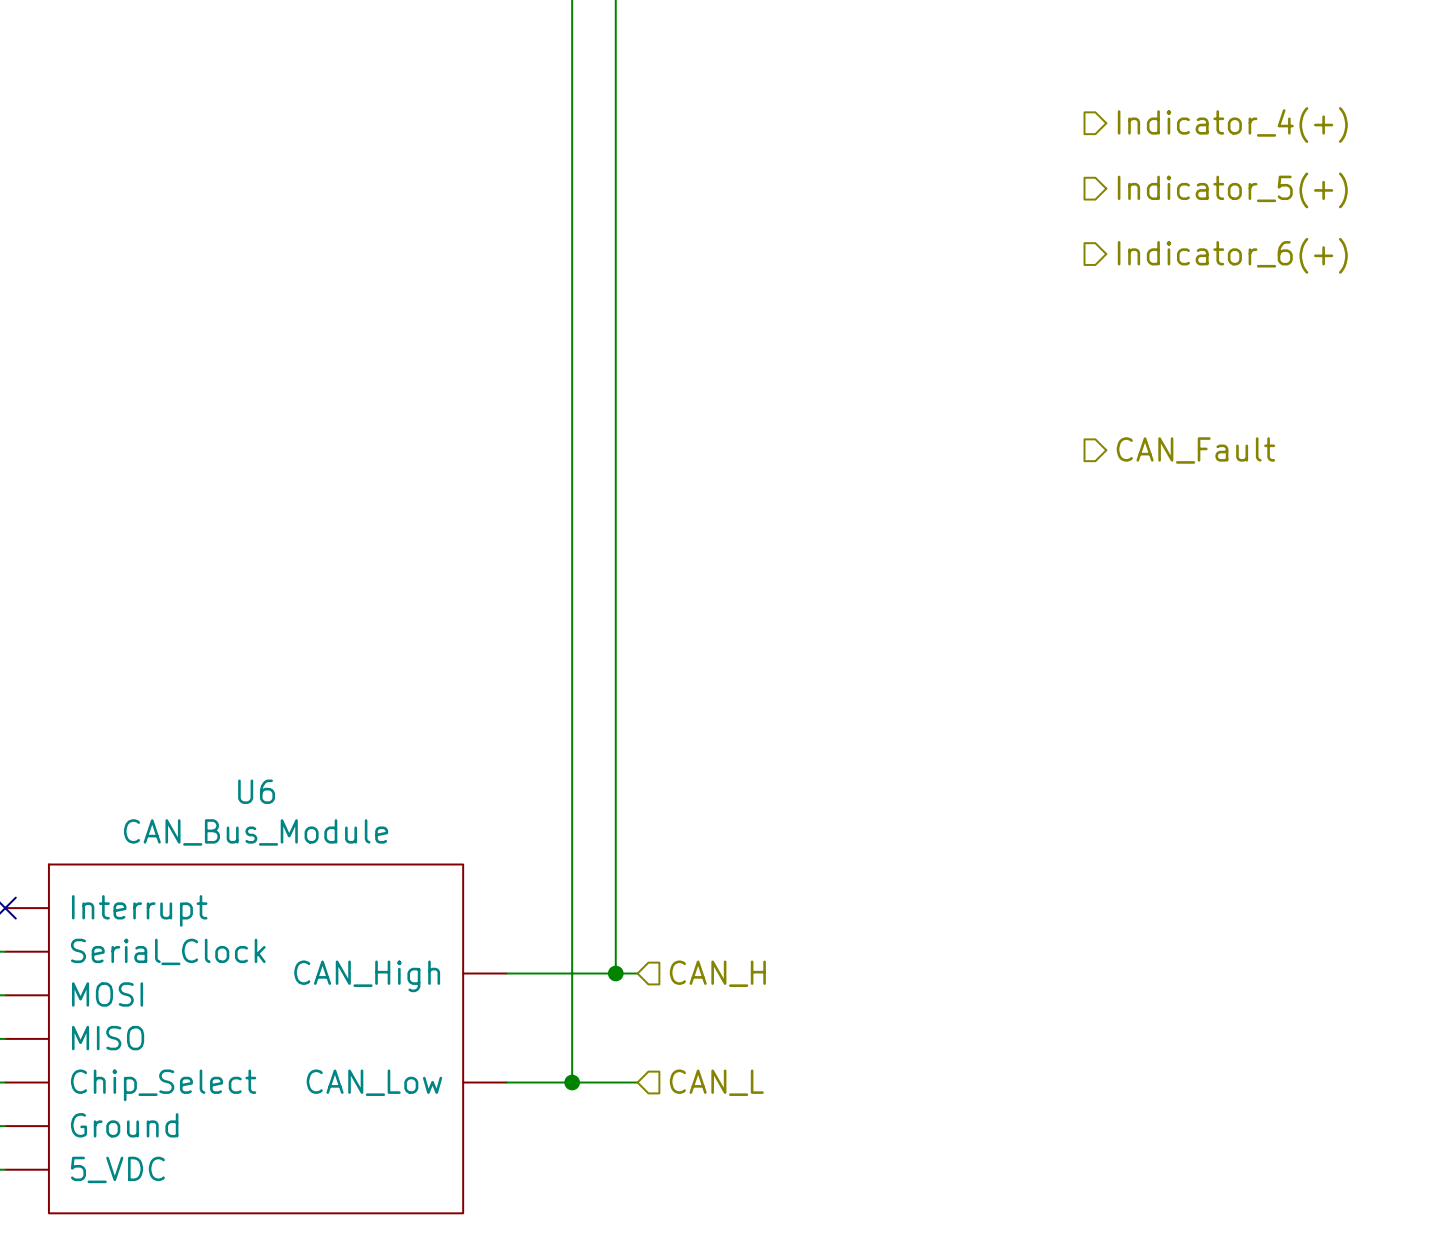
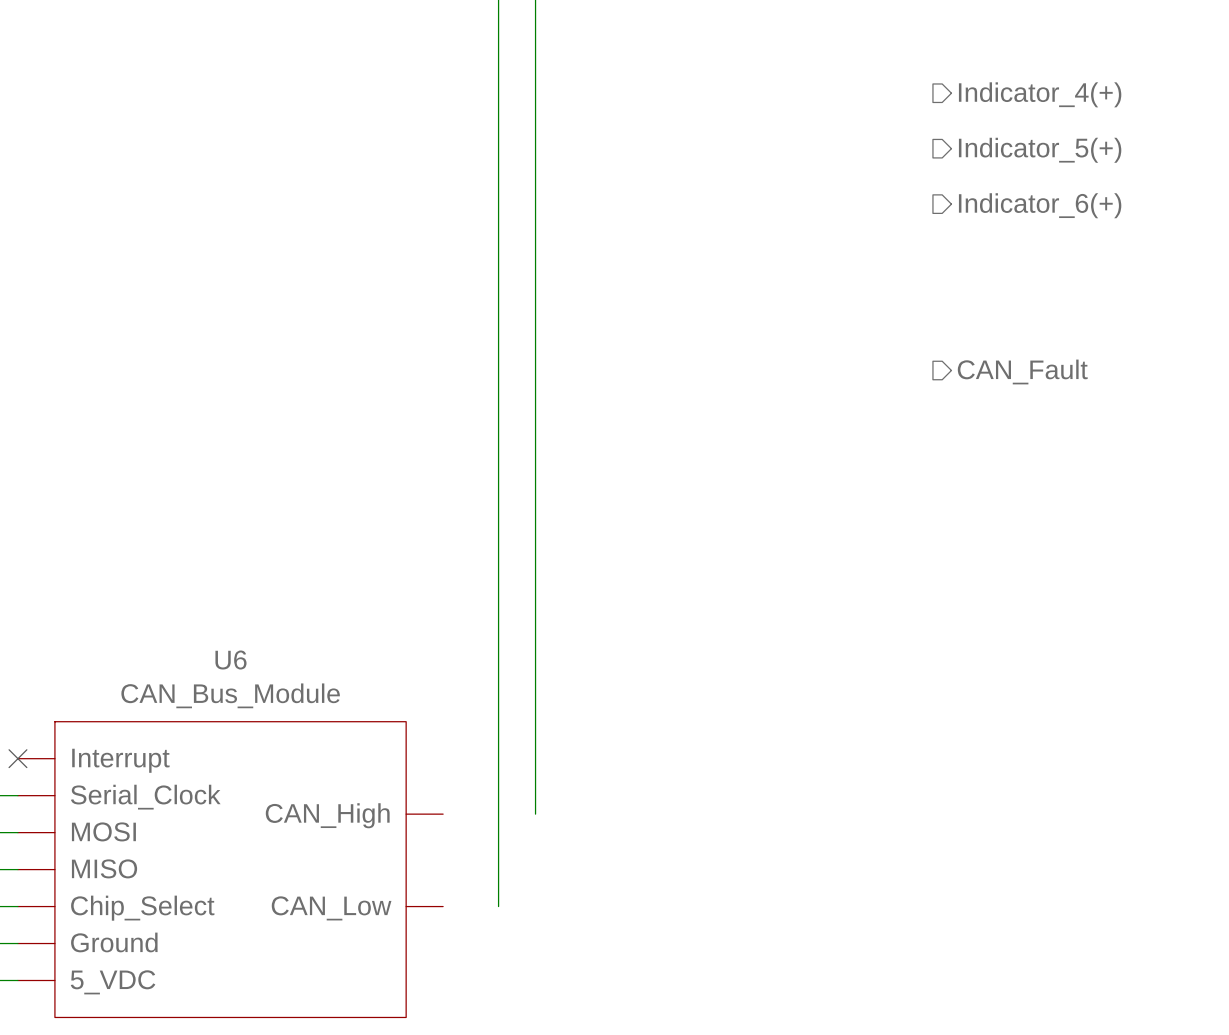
wire: (506, 973) (637, 973) -> none
junction: (615, 973) -> none
hierarchical label: CAN_H (717, 973) -> none
wire: (506, 1082) (637, 1082) -> none
junction: (572, 1082) -> none
hierarchical label: CAN_L (716, 1082) -> none

